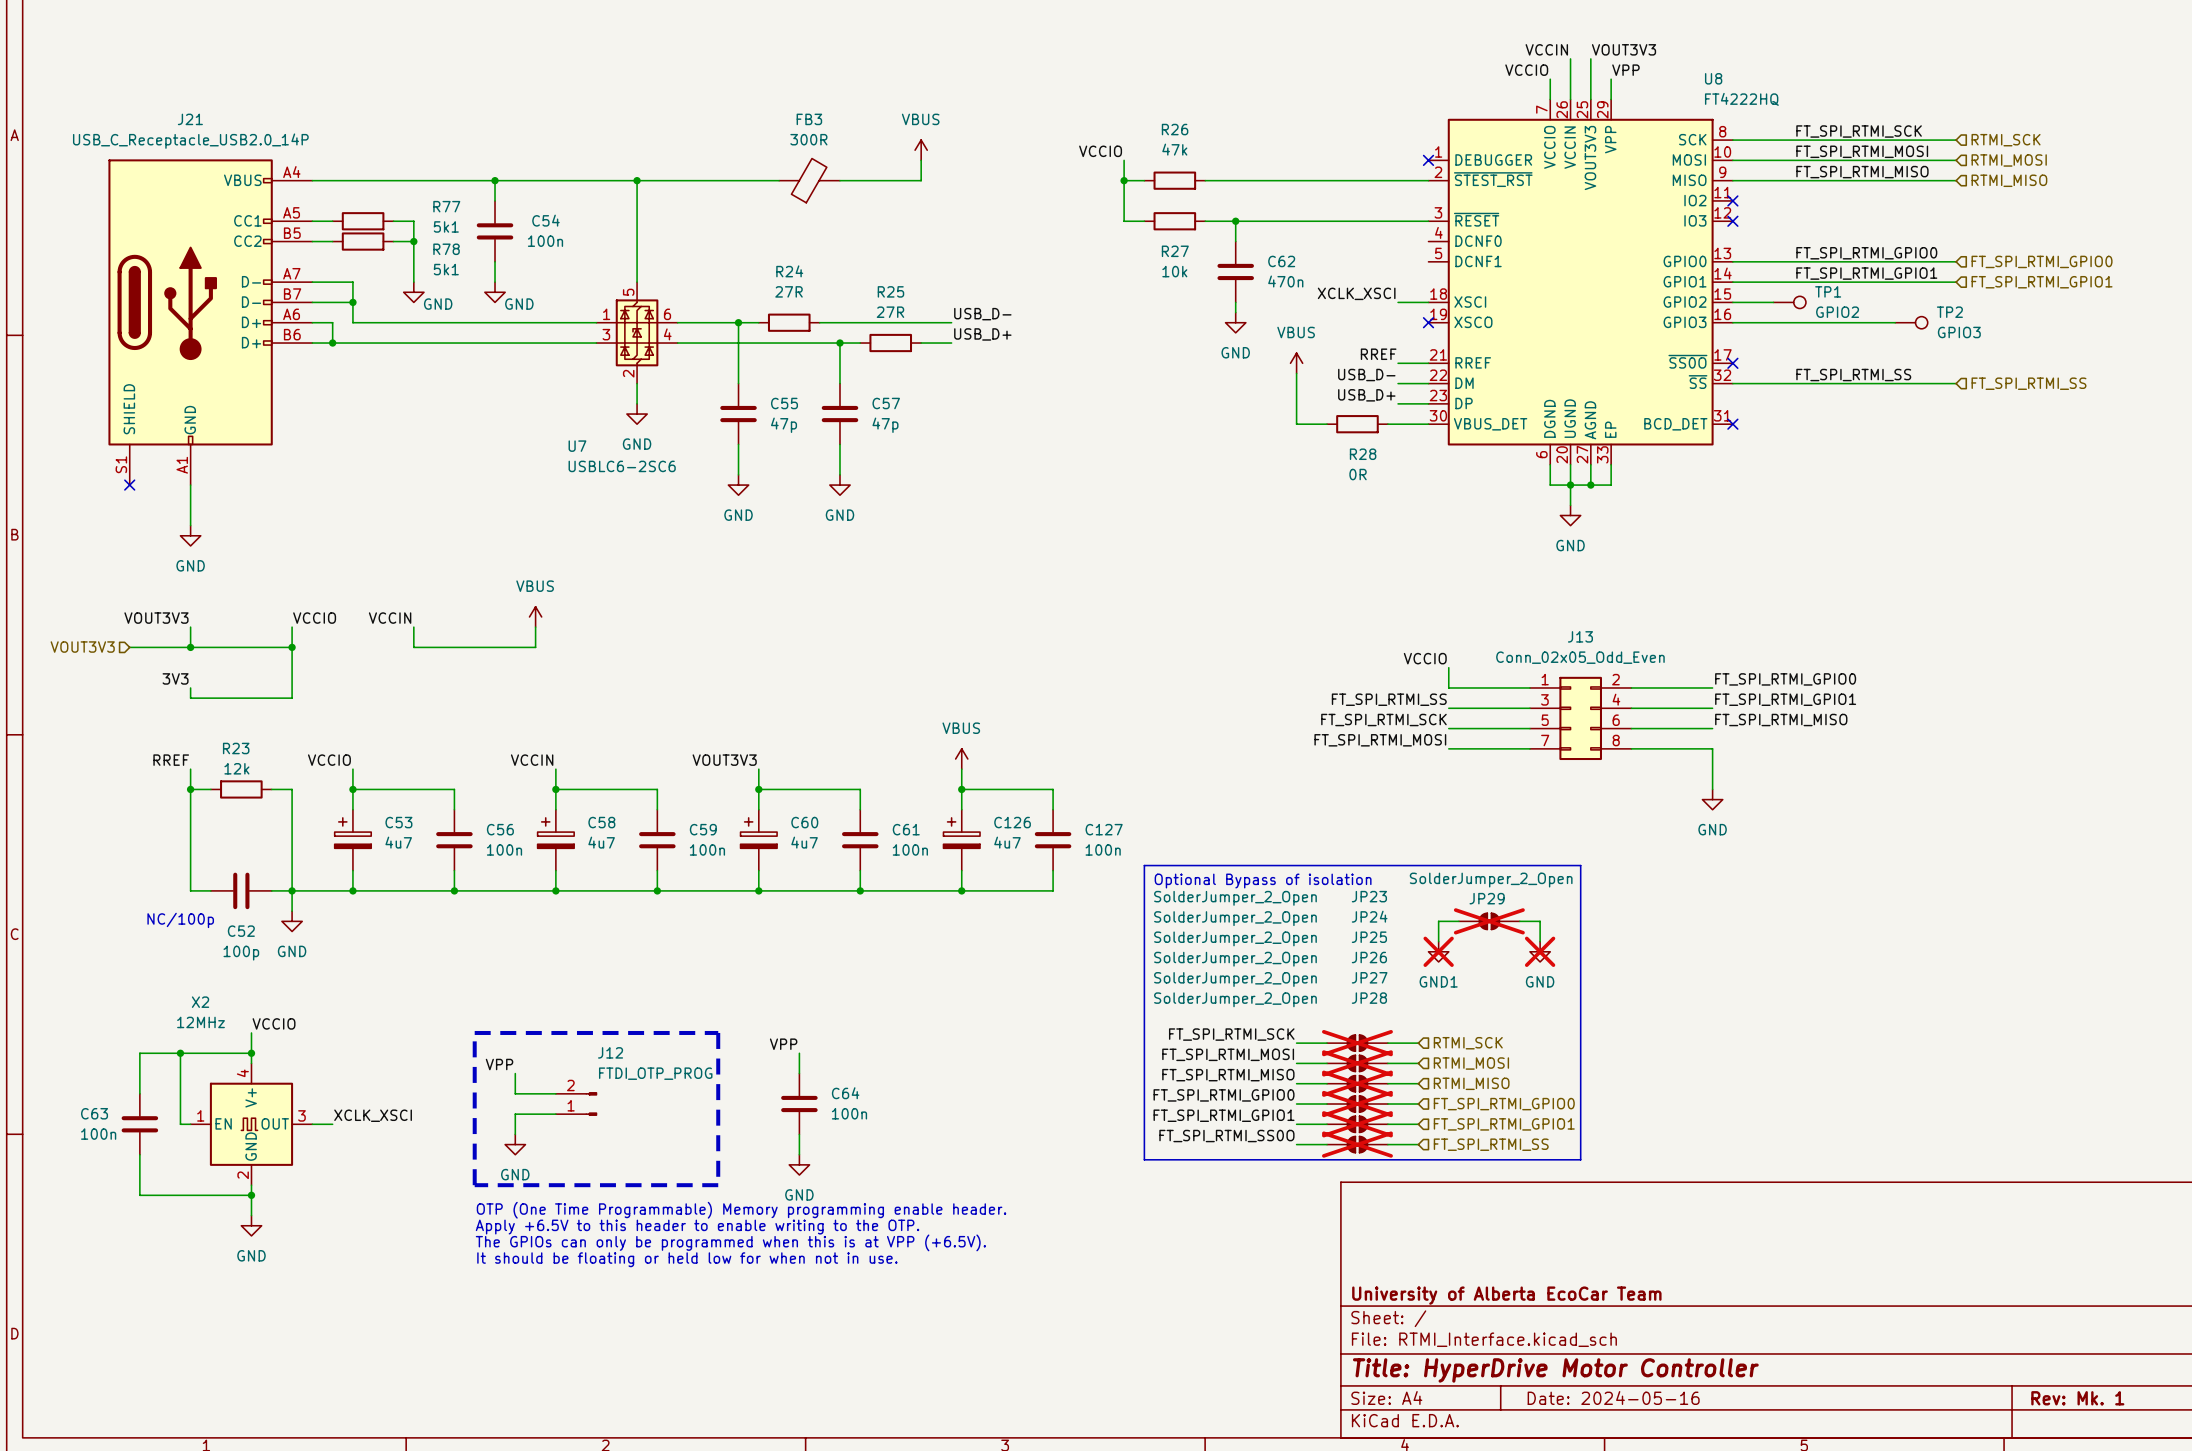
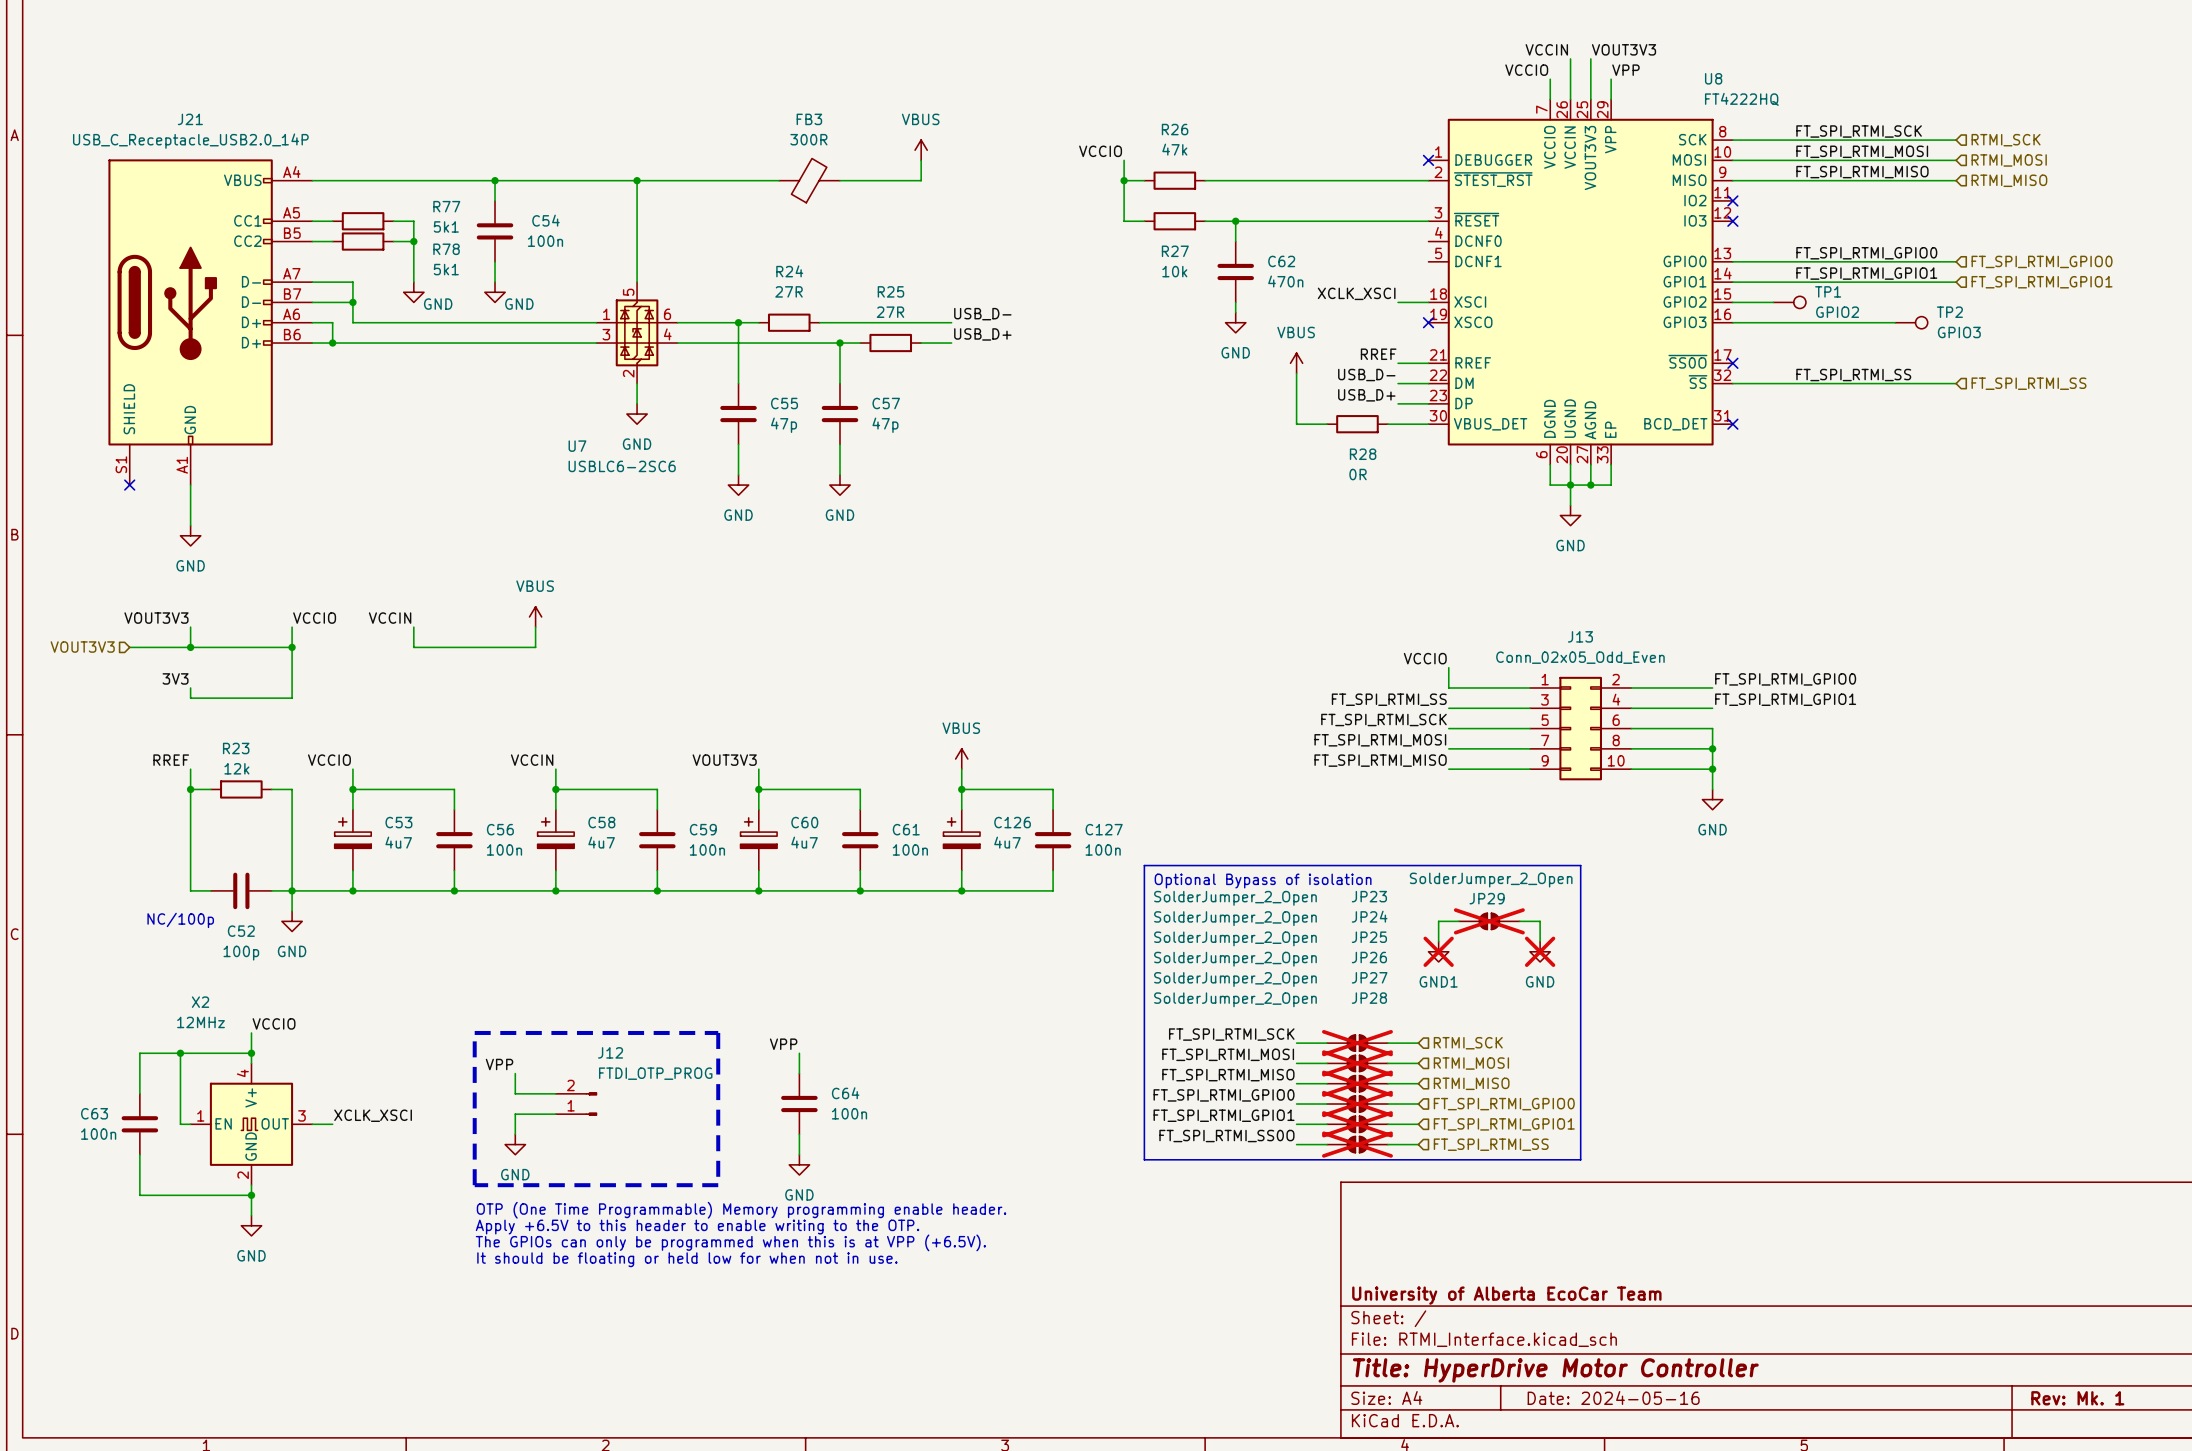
J13 symbol: [1529, 676, 1632, 761] -> [1529, 676, 1632, 781]
label: FT_SPI_RTMI_MISO (1781, 720) -> none
wire: none -> (1712, 728) (1712, 748)
junction: none -> (1712, 748)
label: none -> FT_SPI_RTMI_MISO (1380, 760)
wire: none -> (1448, 769) (1529, 769)
wire: none -> (1631, 769) (1712, 769)
junction: none -> (1712, 769)

